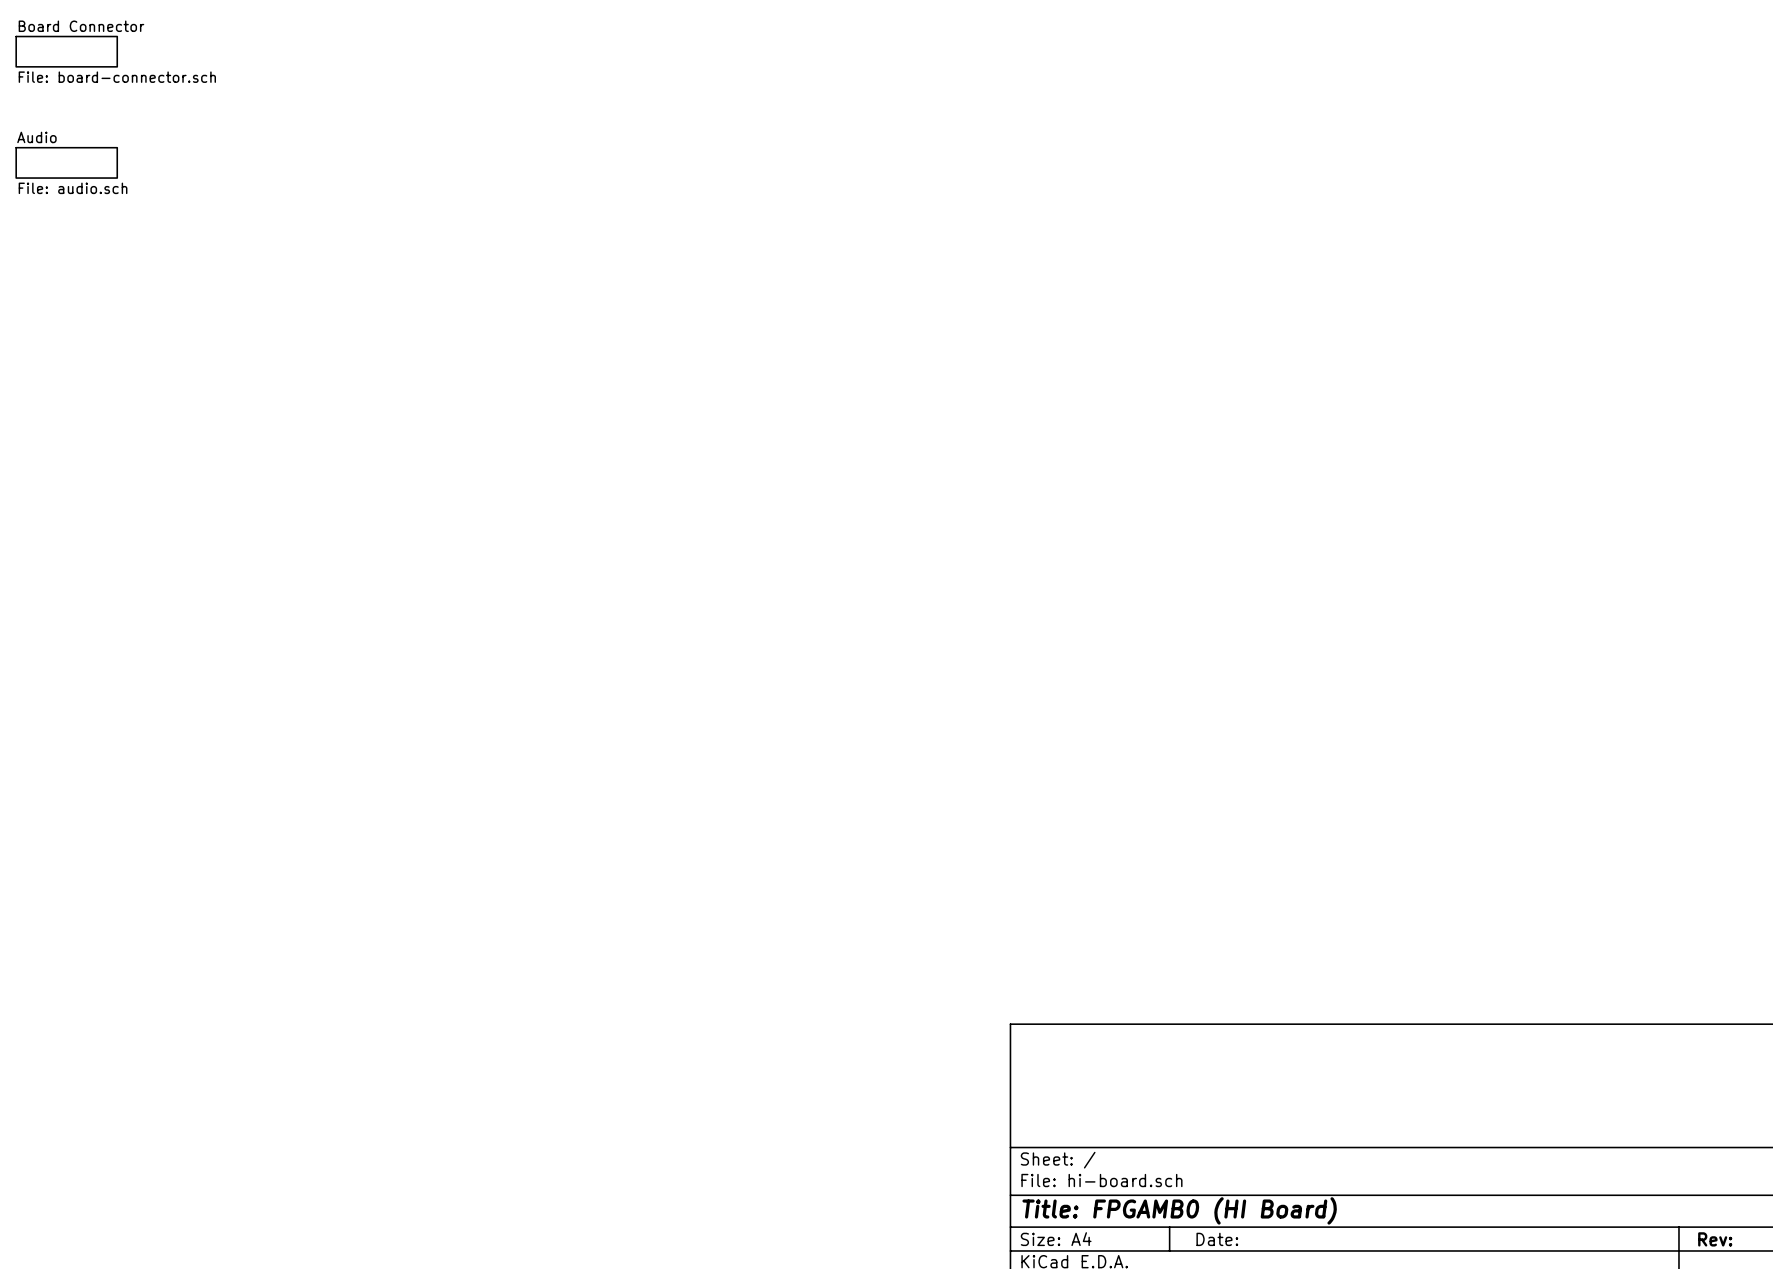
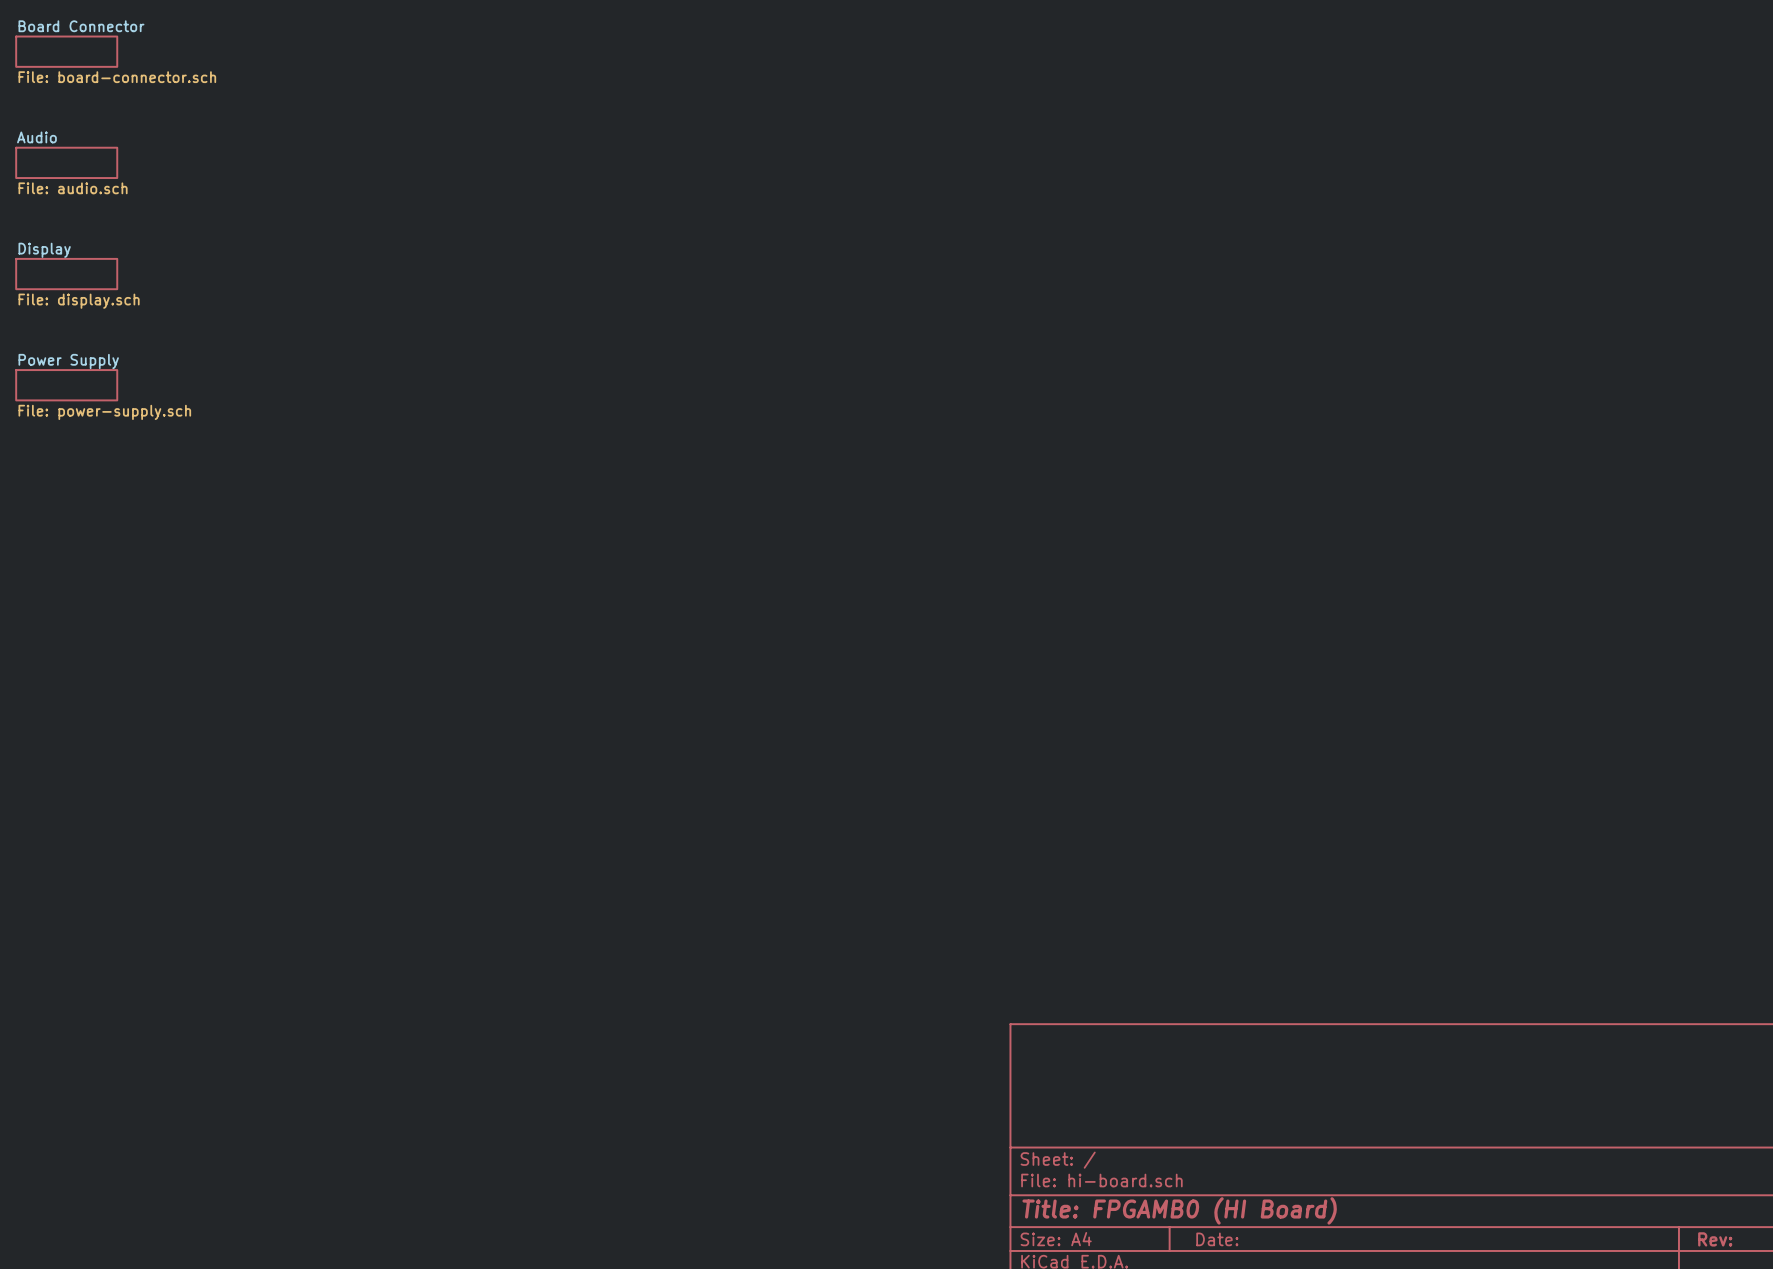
sheet Display: none -> File: display.sch (66, 274)
sheet Power Supply: none -> File: power-supply.sch (66, 385)

